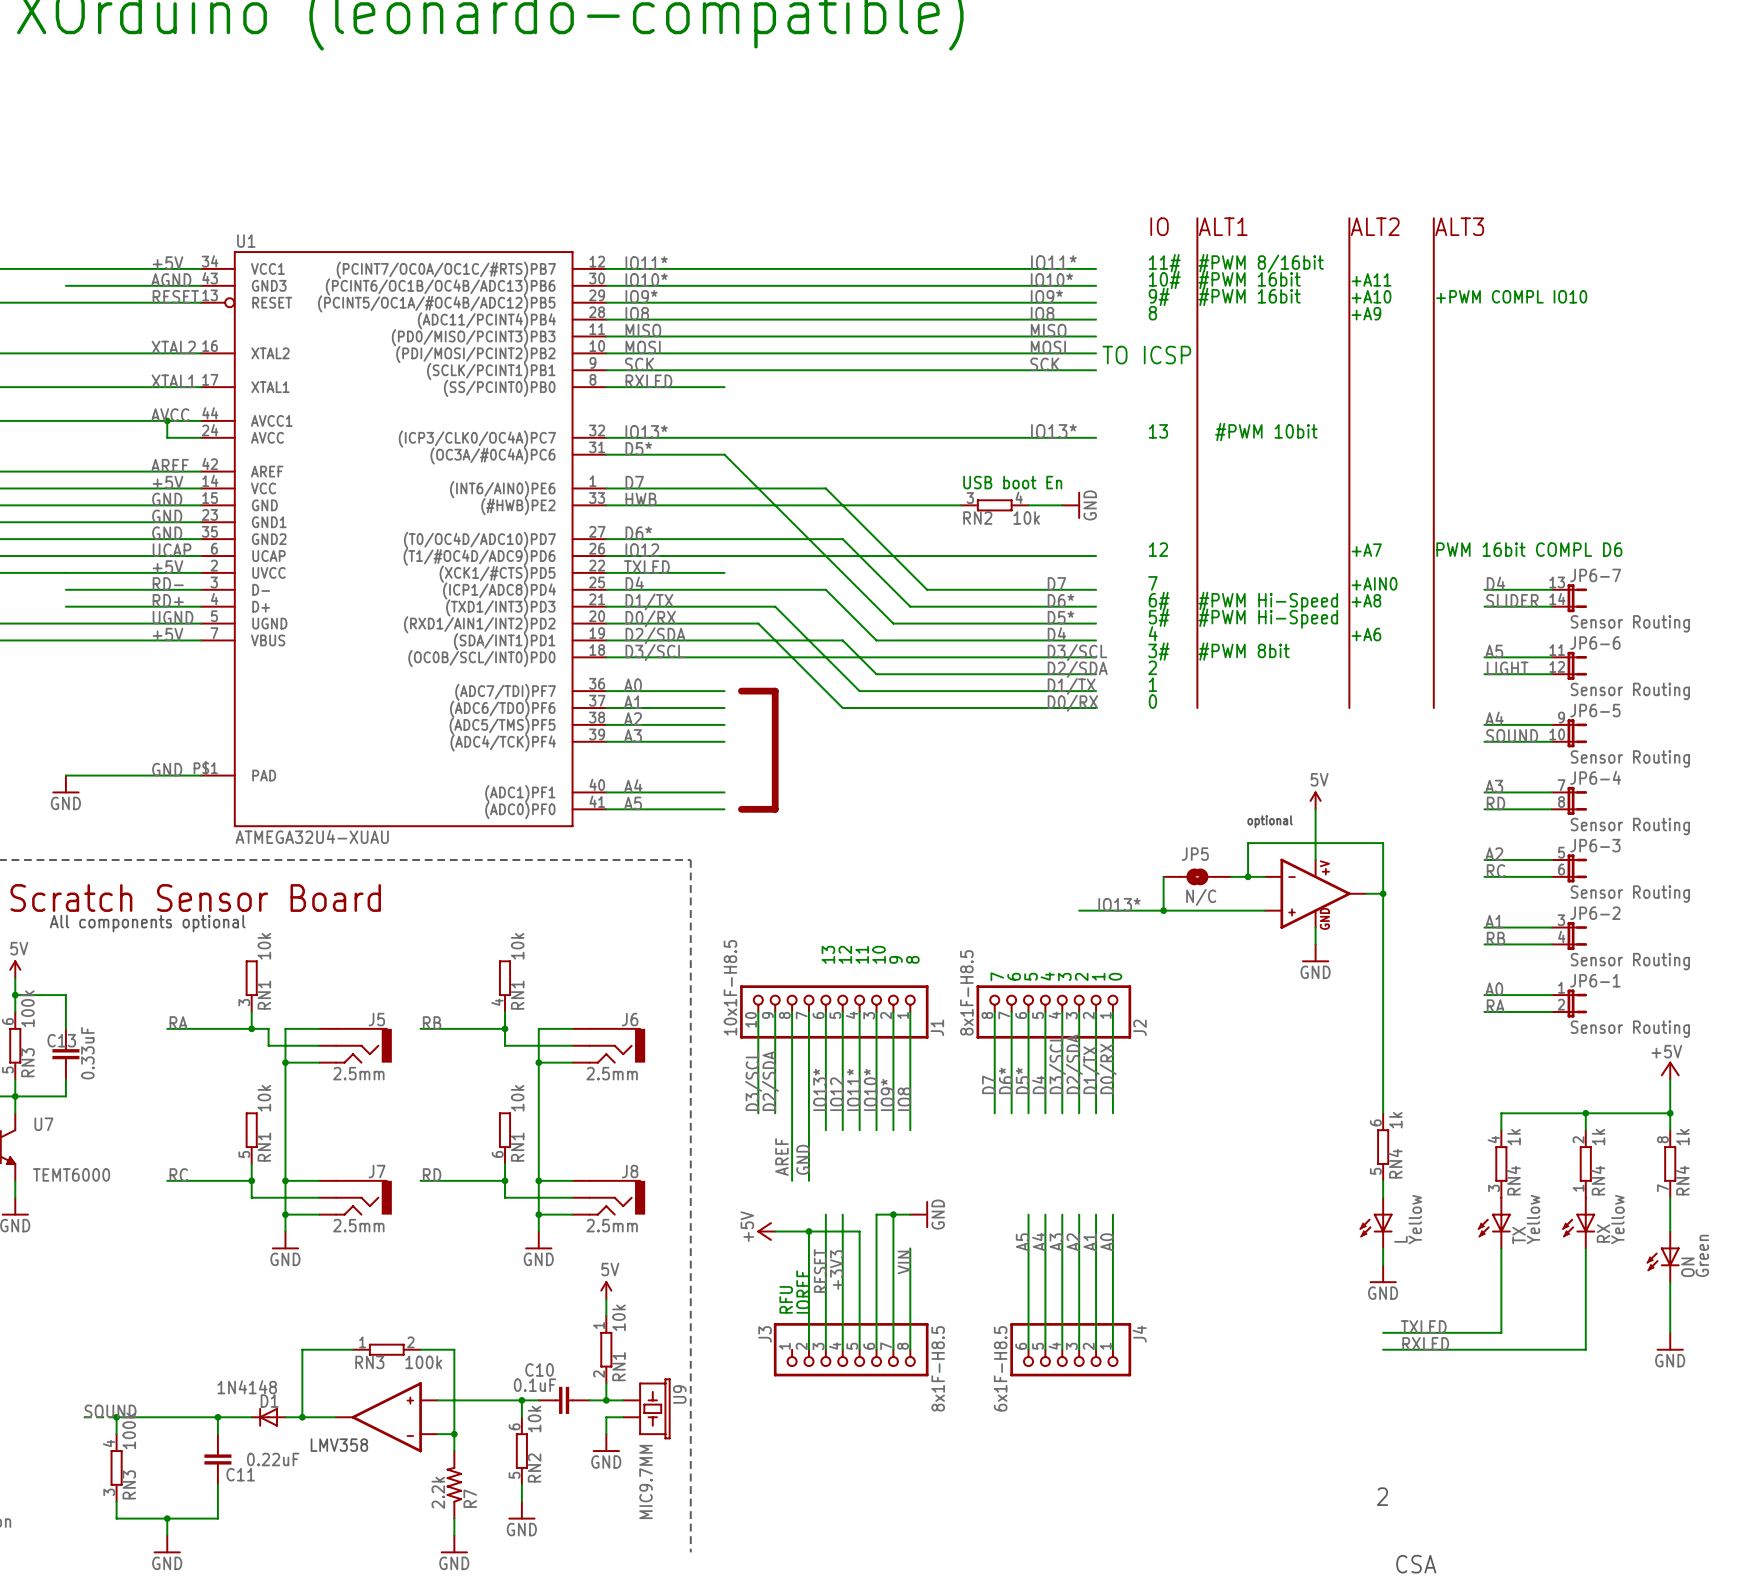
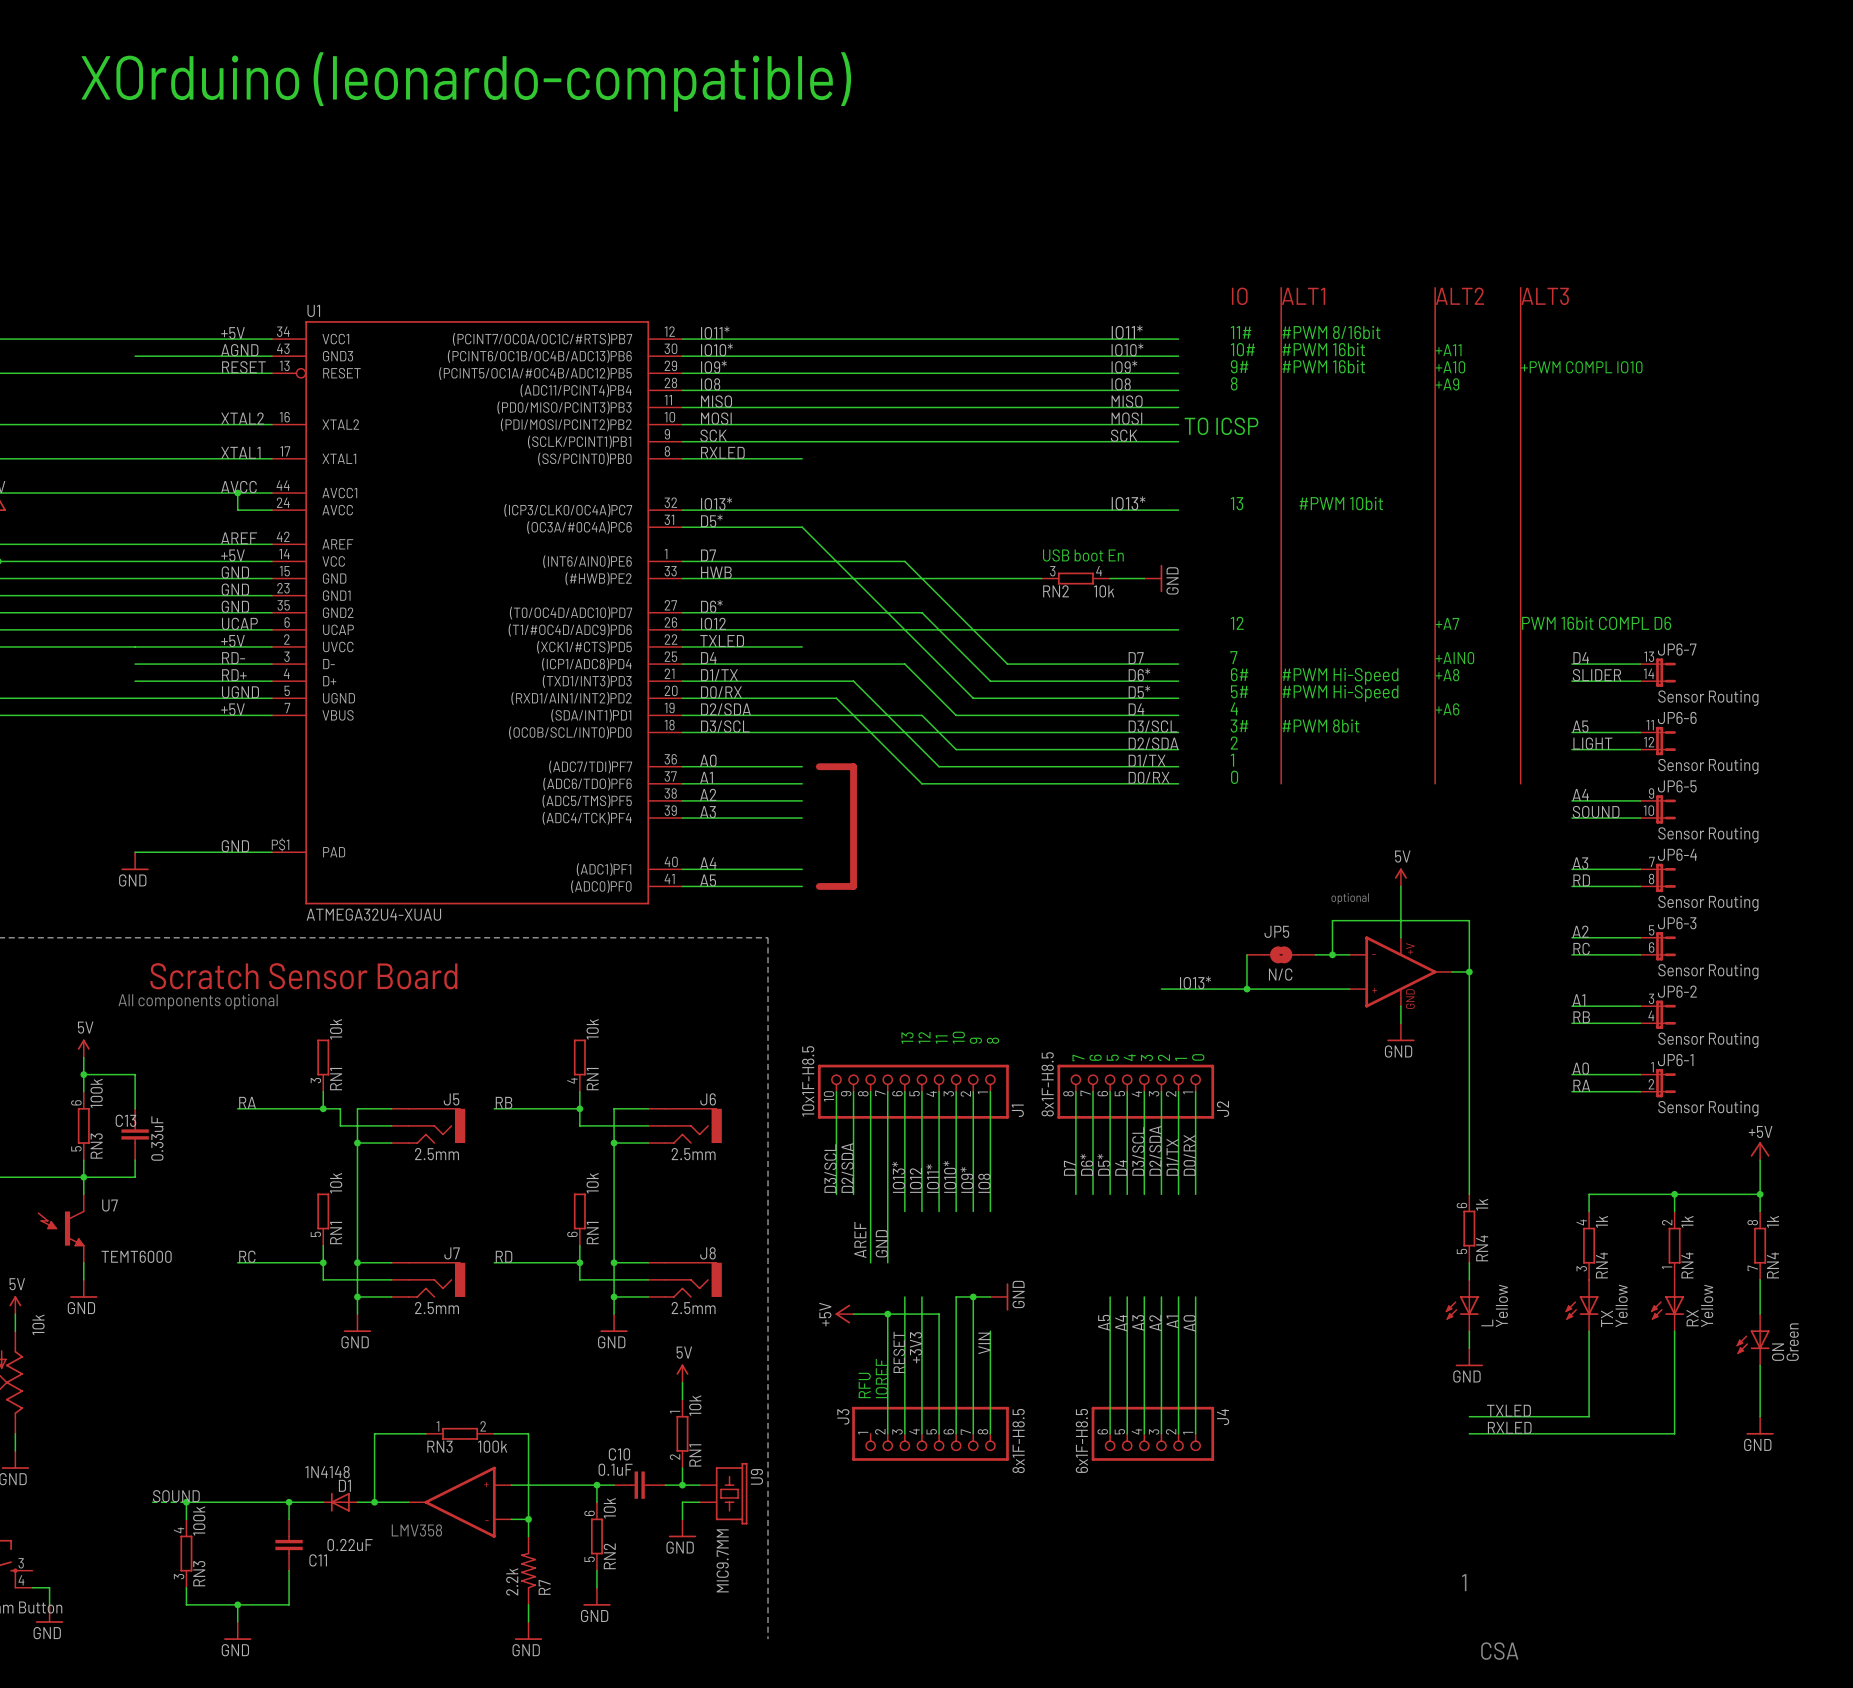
text: 2 (1382, 1496) -> 1 (1464, 1582)

